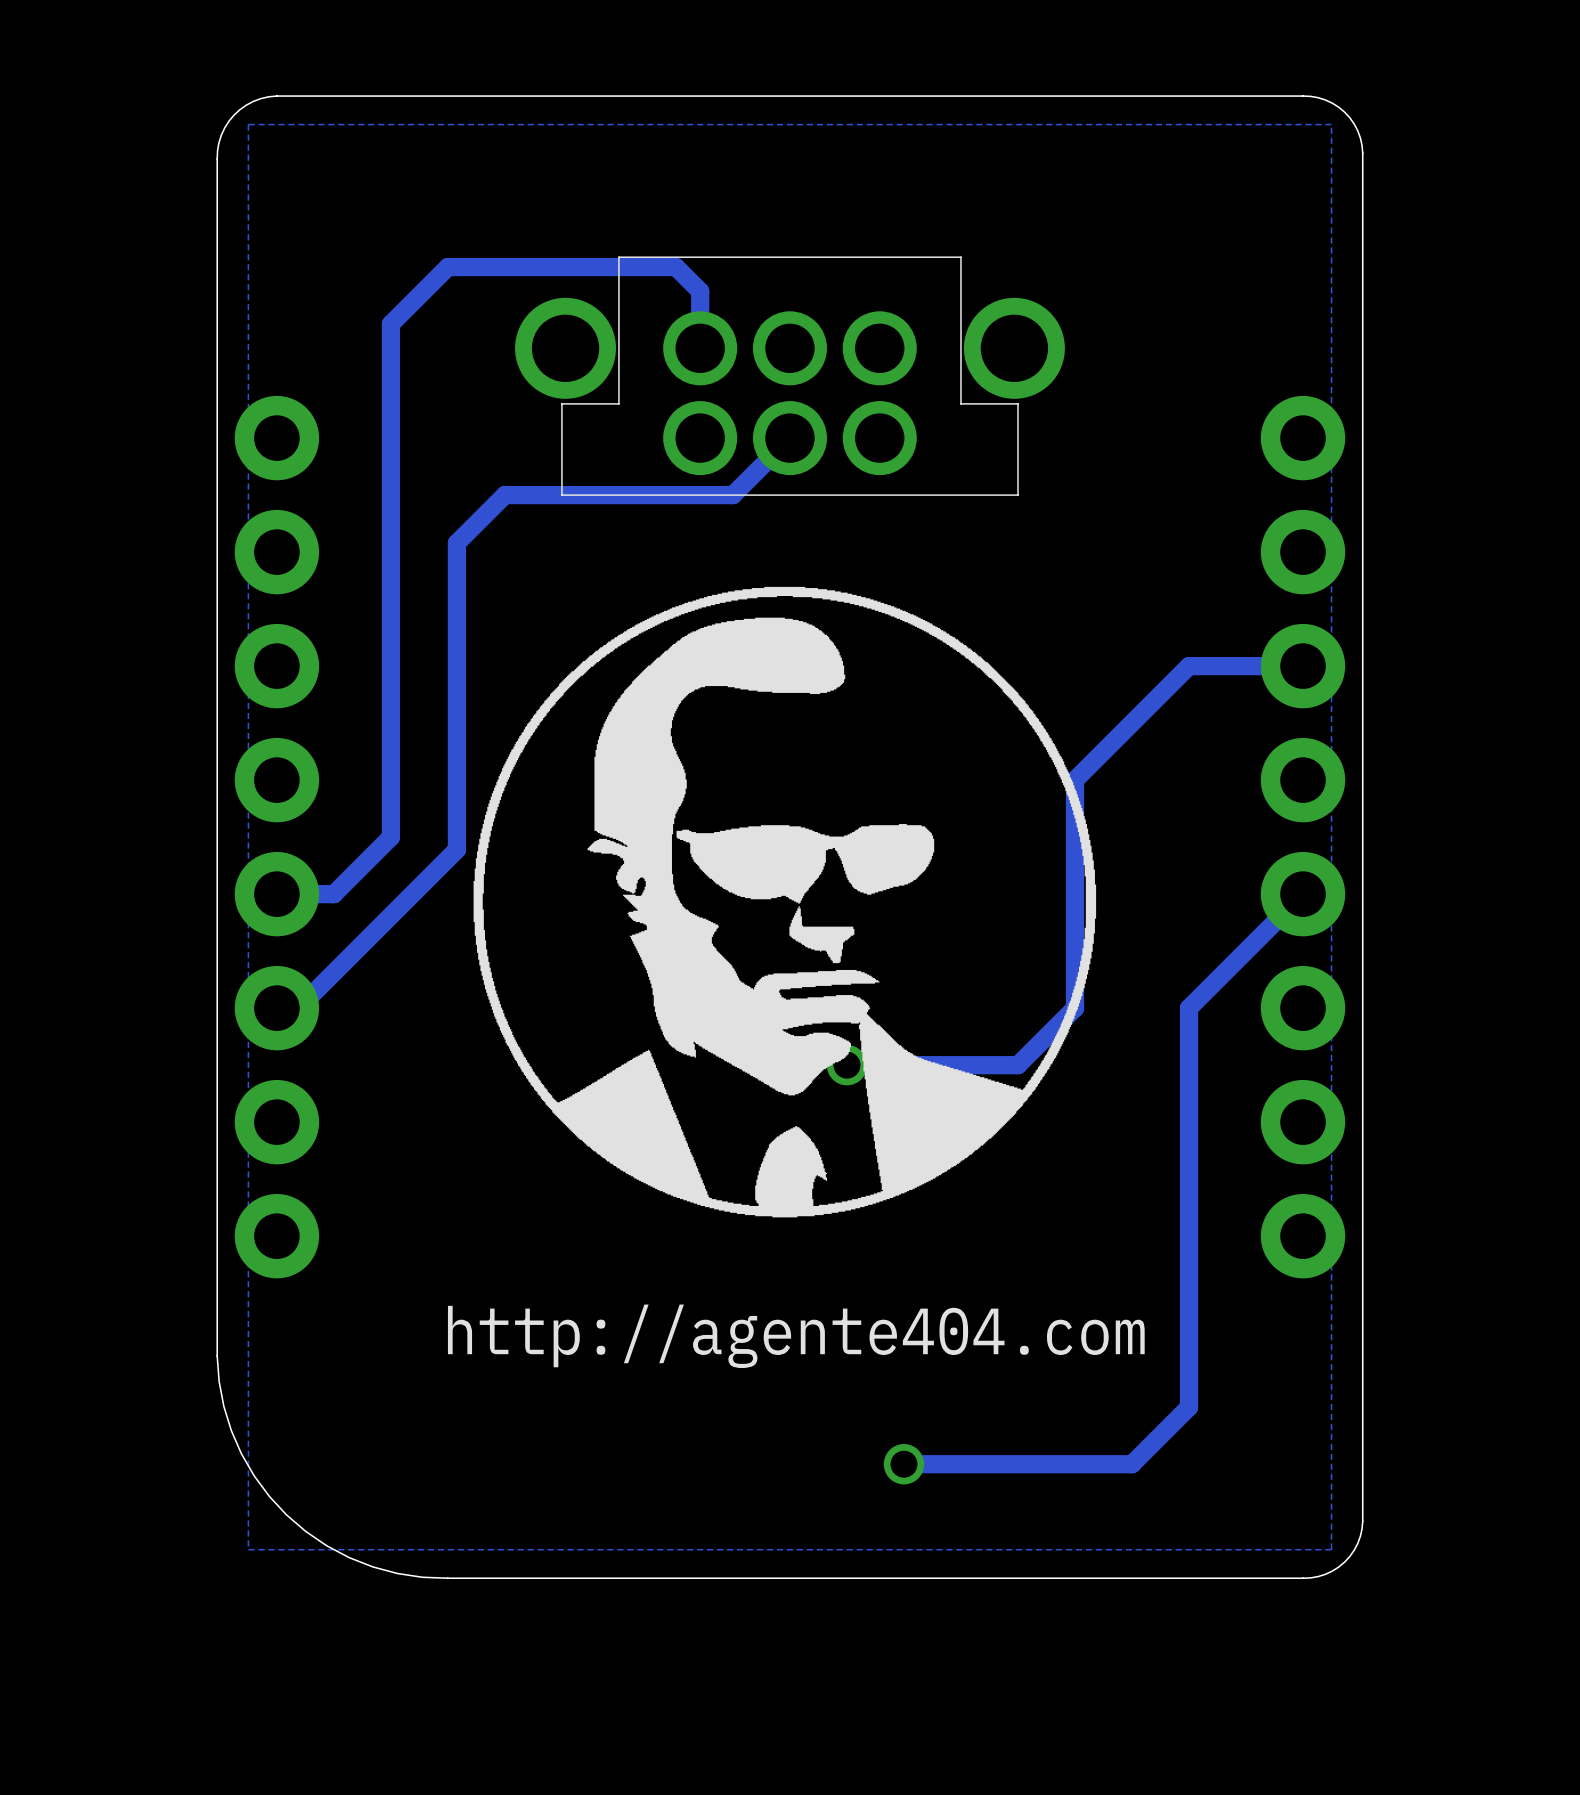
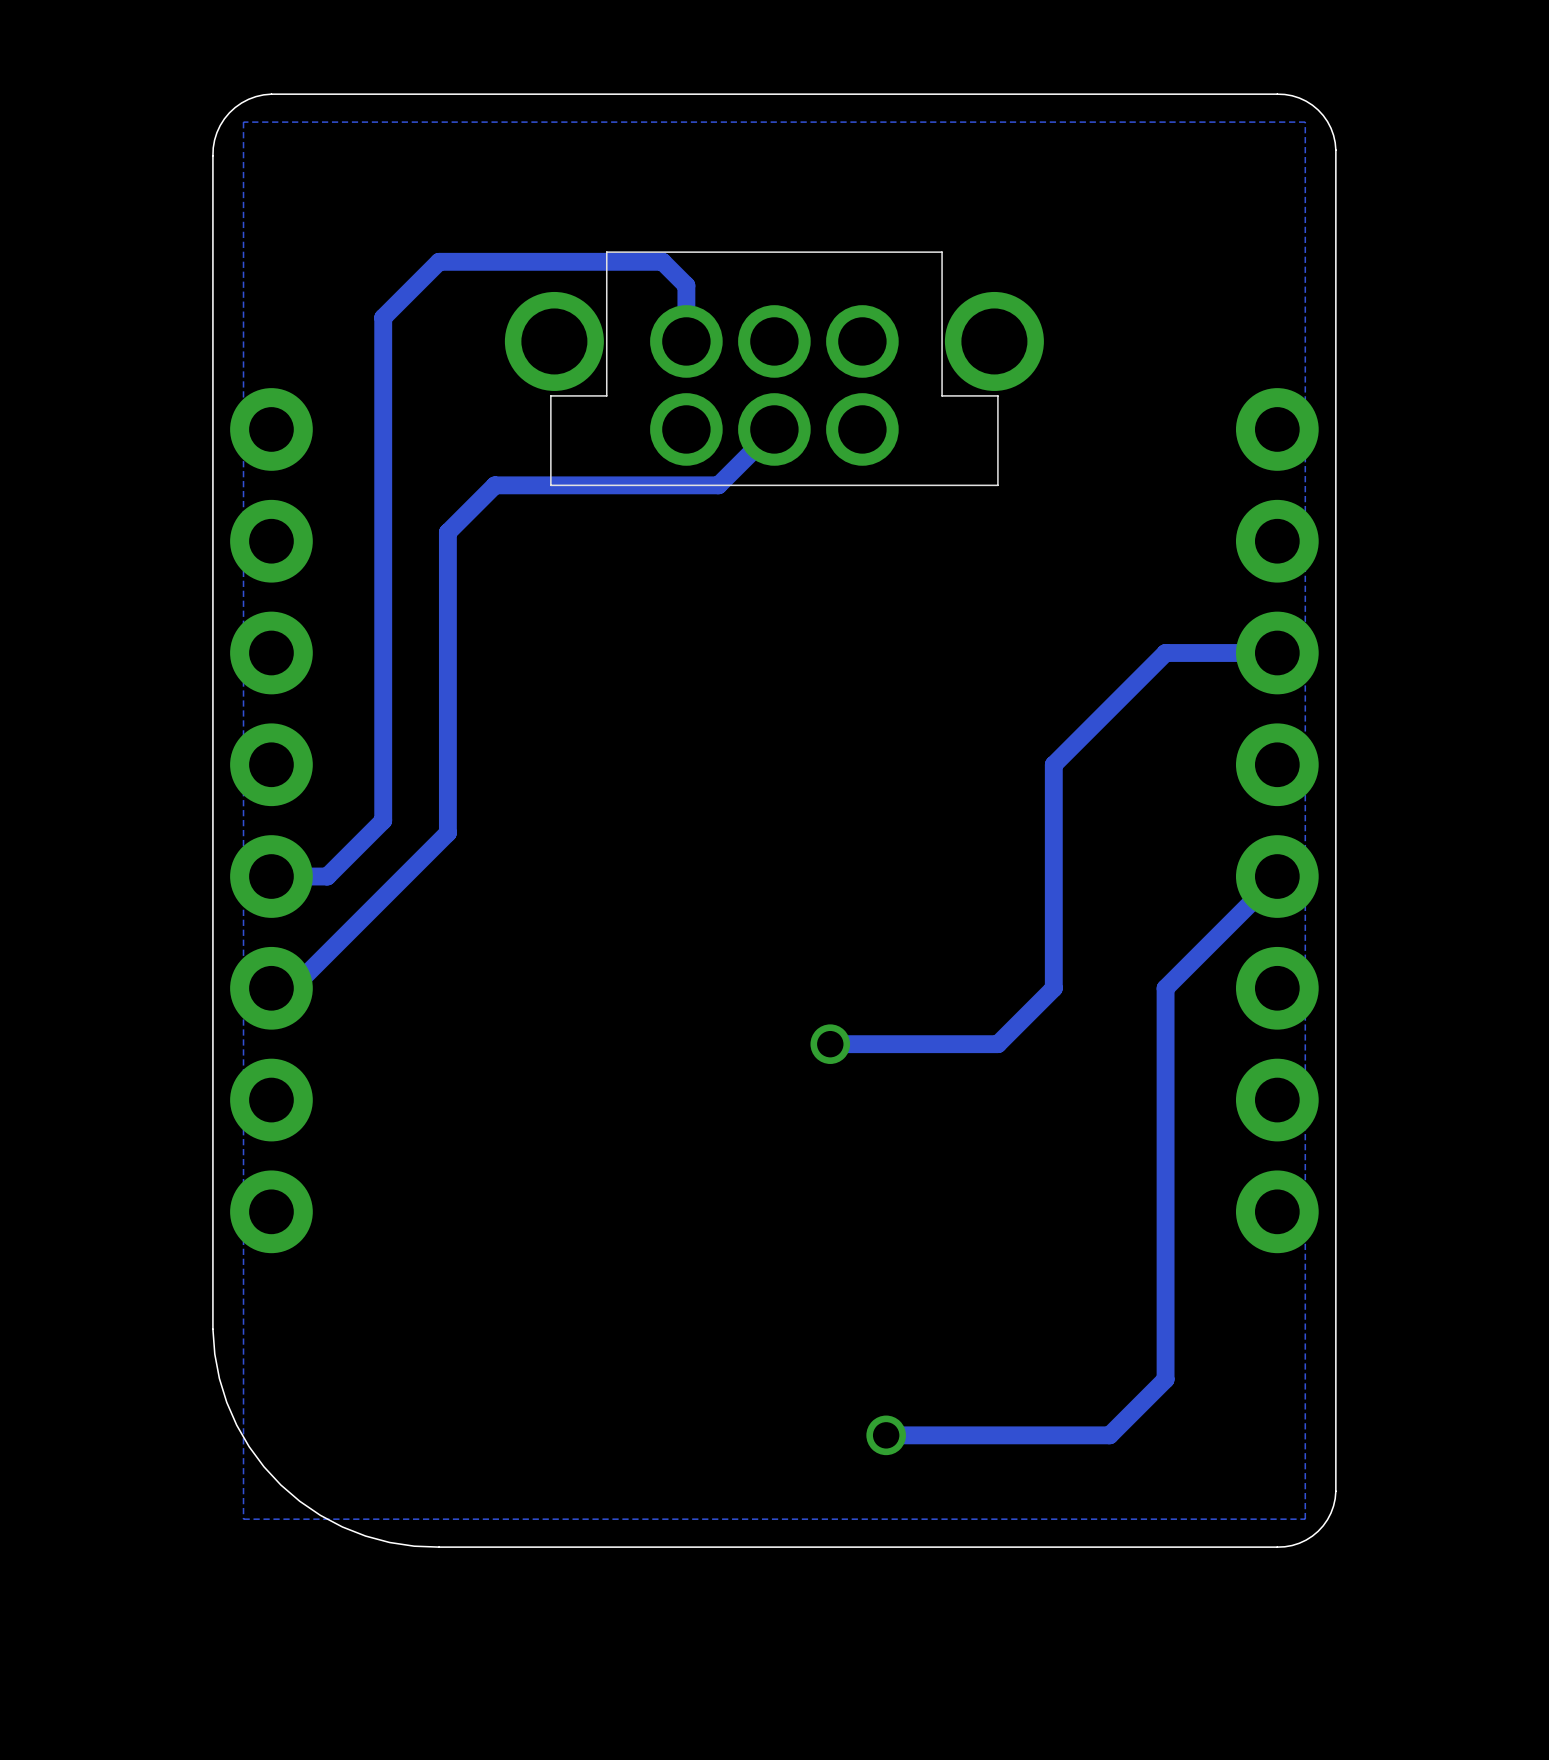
drawing: [473, 586, 1097, 1218] -> none
text: http://agente404.com (796, 1336) -> none

